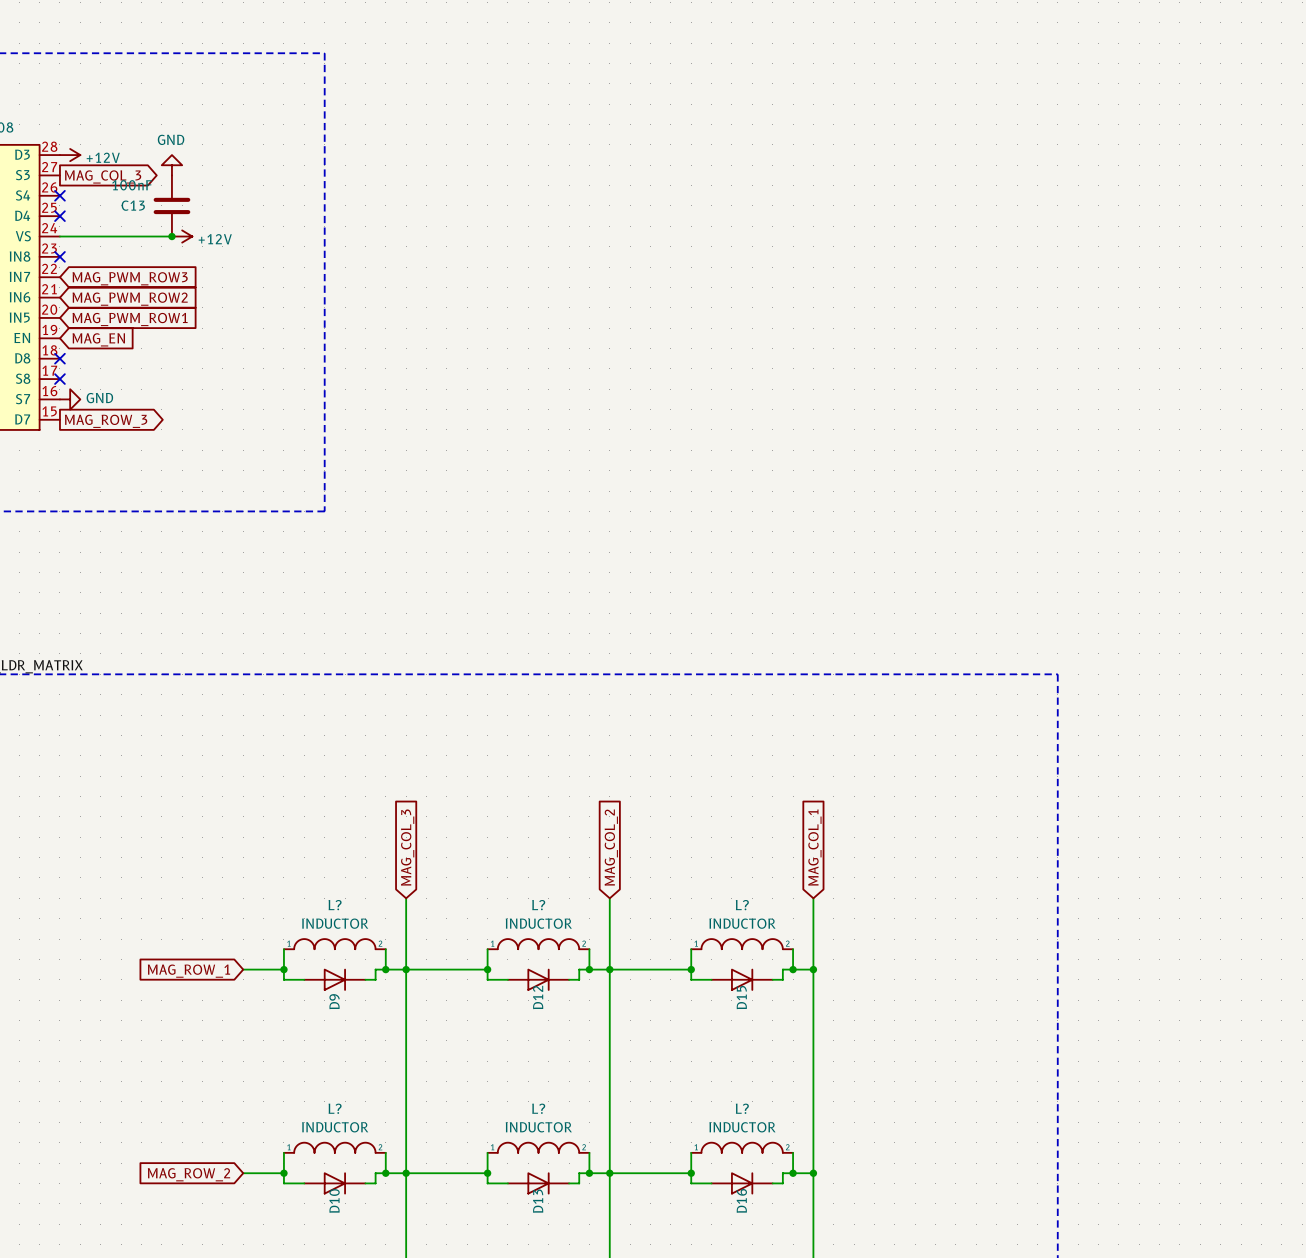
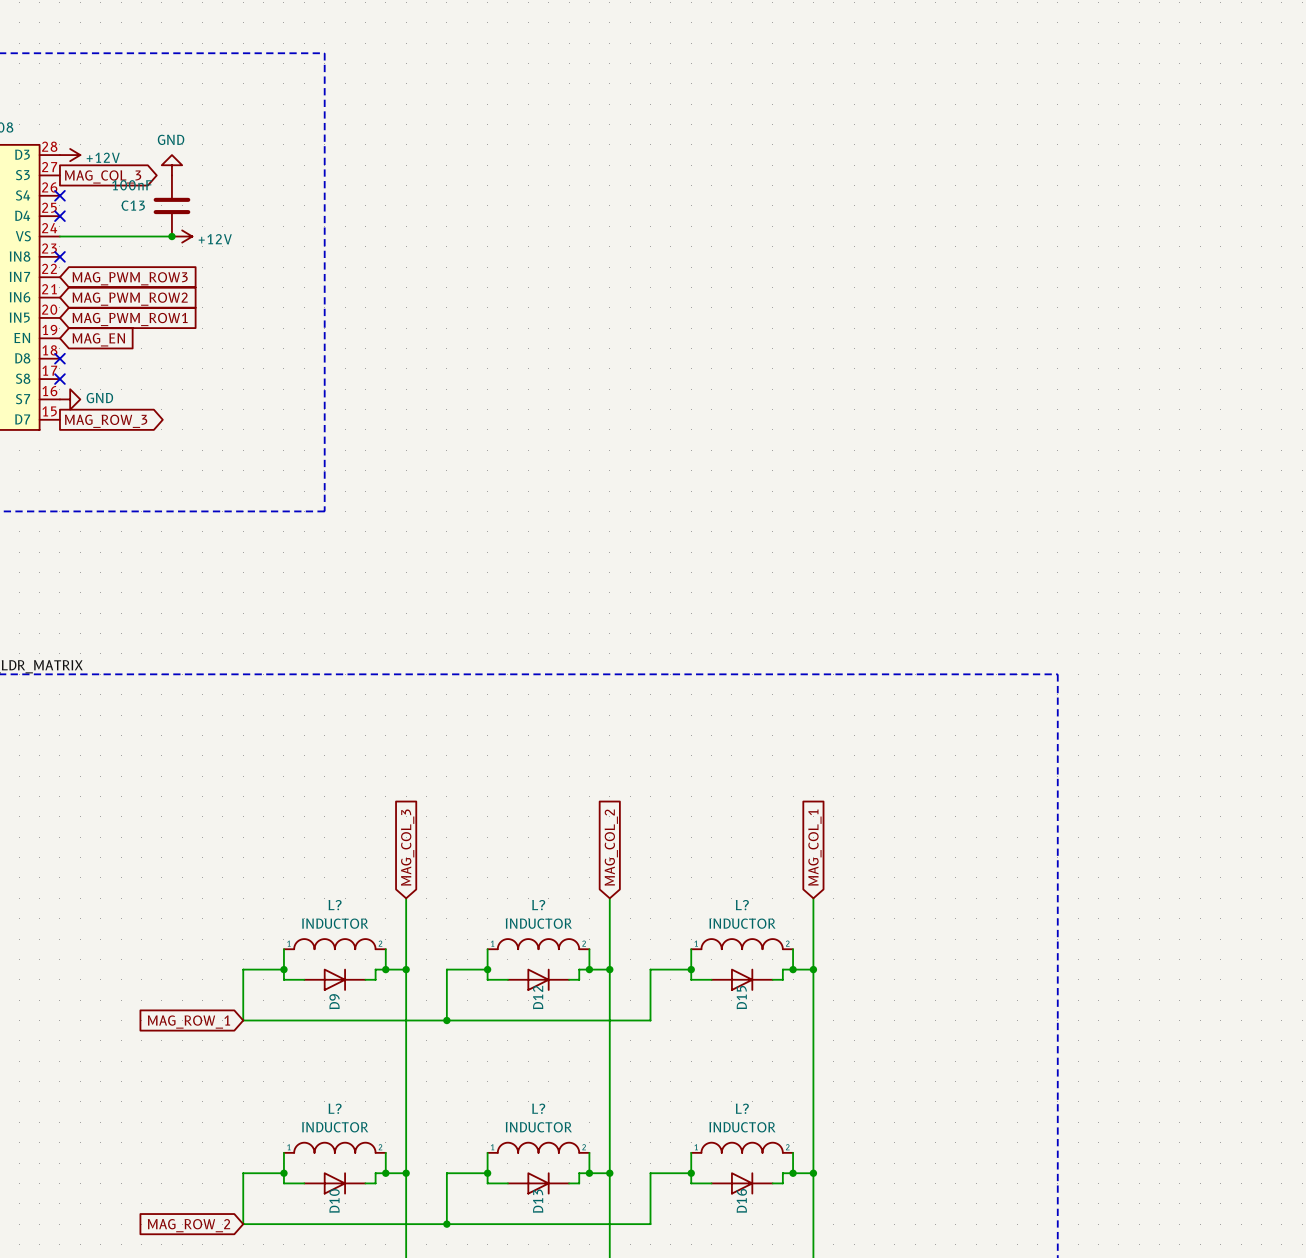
wire: (406, 969) (446, 969) -> (446, 1020) (446, 969)
wire: (609, 969) (650, 969) -> (243, 969) (243, 1020) (650, 1020) (650, 969)
global label position: MAG_ROW_1 (188, 971) -> MAG_ROW_1 (188, 1022)
junction: none -> (446, 1020)
wire: (406, 1173) (446, 1173) -> (446, 1224) (446, 1173)
wire: (609, 1173) (650, 1173) -> (243, 1173) (243, 1224) (650, 1224) (650, 1173)
global label position: MAG_ROW_2 (189, 1174) -> MAG_ROW_2 (189, 1225)
junction: none -> (446, 1224)

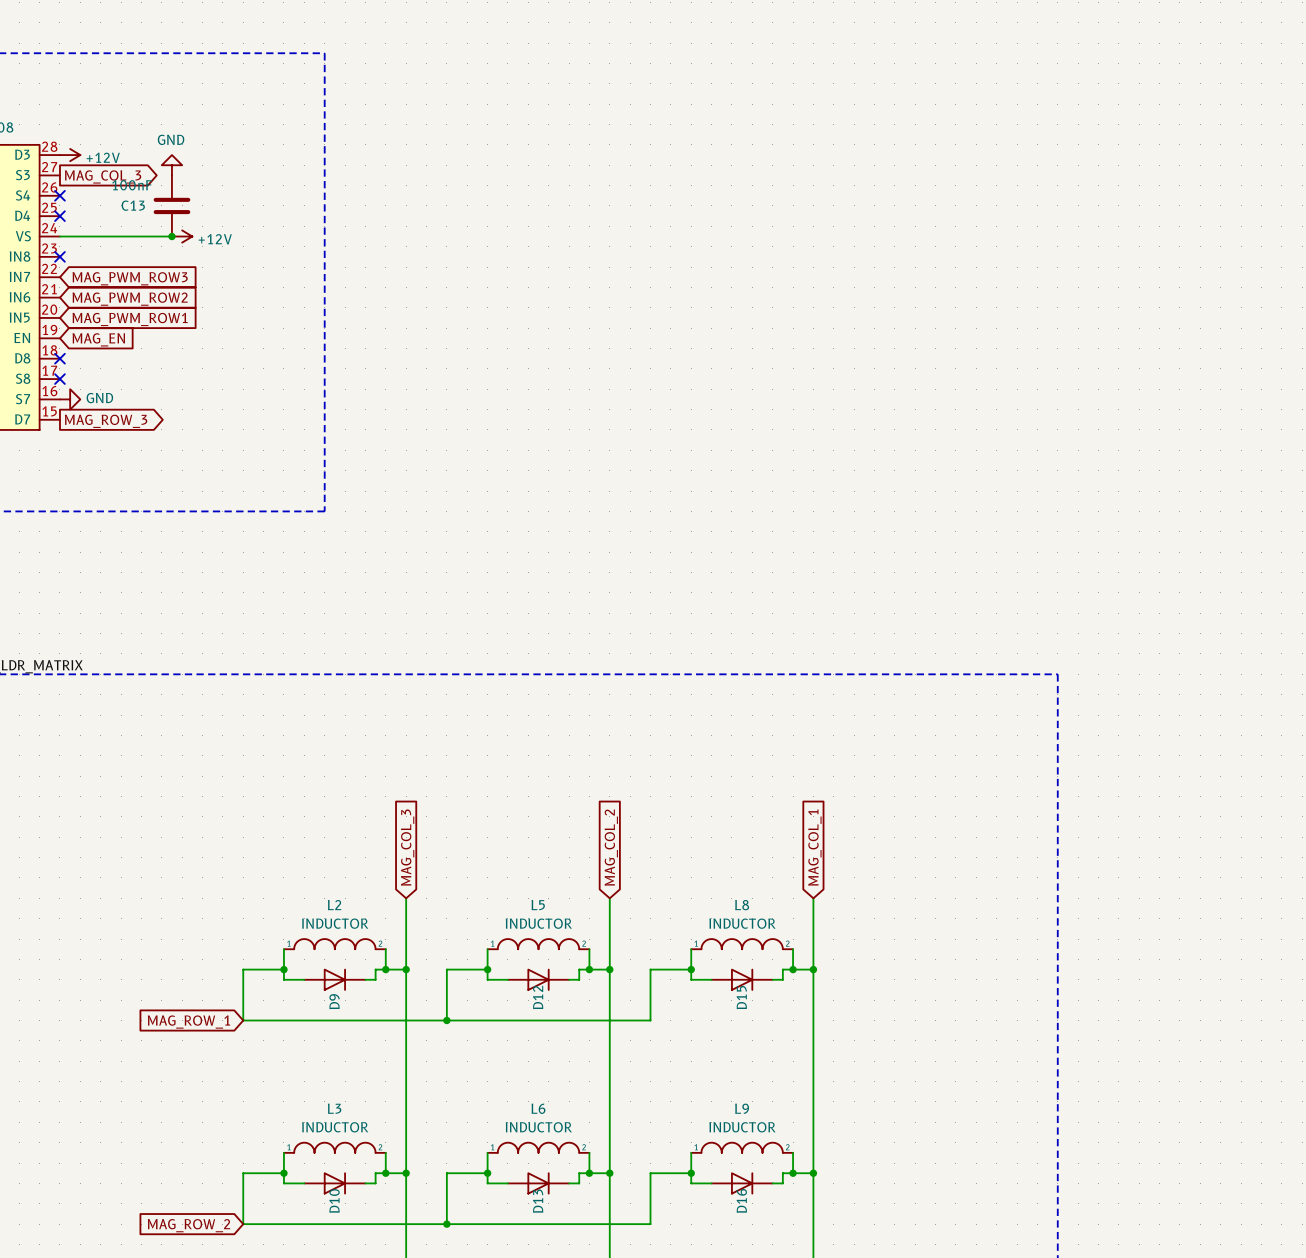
L? name: L? (335, 905) -> L2 (334, 905)
L? name: L? (538, 905) -> L5 (538, 905)
L? name: L? (742, 905) -> L8 (742, 905)
L? name: L? (335, 1108) -> L3 (334, 1108)
L? name: L? (538, 1108) -> L6 (538, 1108)
L? name: L? (742, 1108) -> L9 (742, 1108)

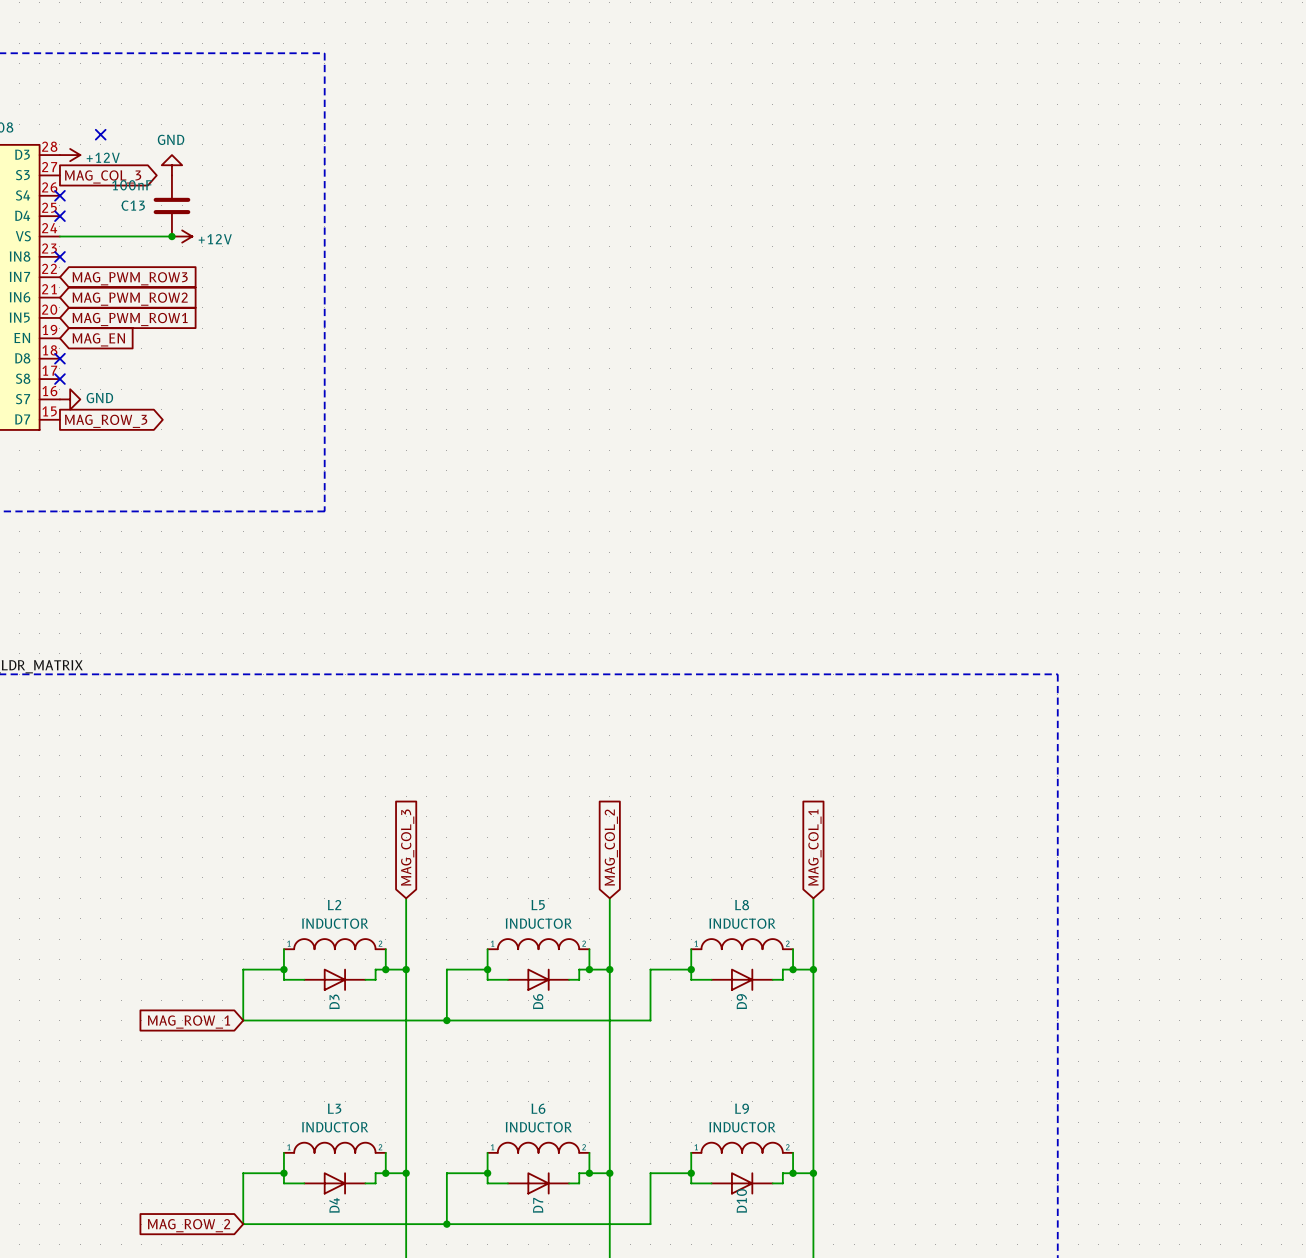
no-connect mark: none -> (100, 134)
D12 name: D12 (538, 997) -> D6 (538, 1001)
D15 name: D15 (741, 997) -> D9 (741, 1001)
D9 name: D9 (334, 1001) -> D3 (334, 1001)
D10 name: D10 (334, 1200) -> D4 (334, 1205)
D16 name: D16 (741, 1200) -> D10 (741, 1200)
D13 name: D13 (538, 1201) -> D7 (538, 1205)

